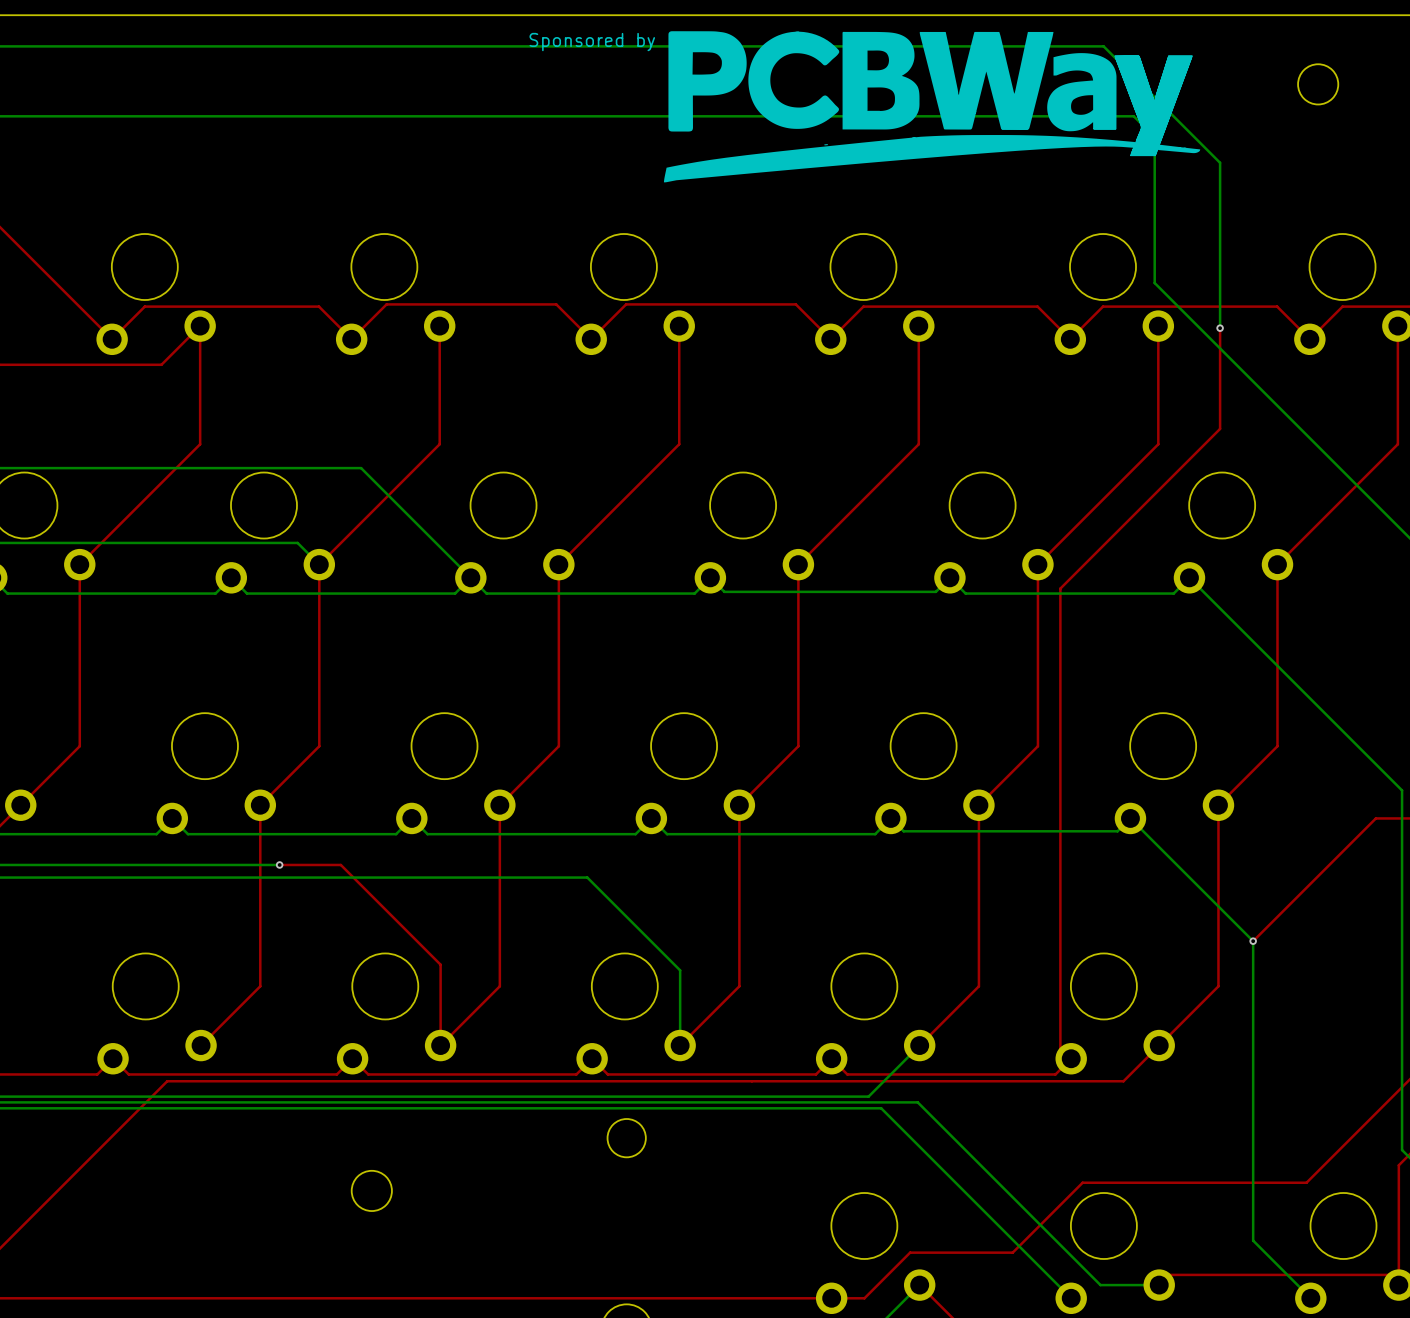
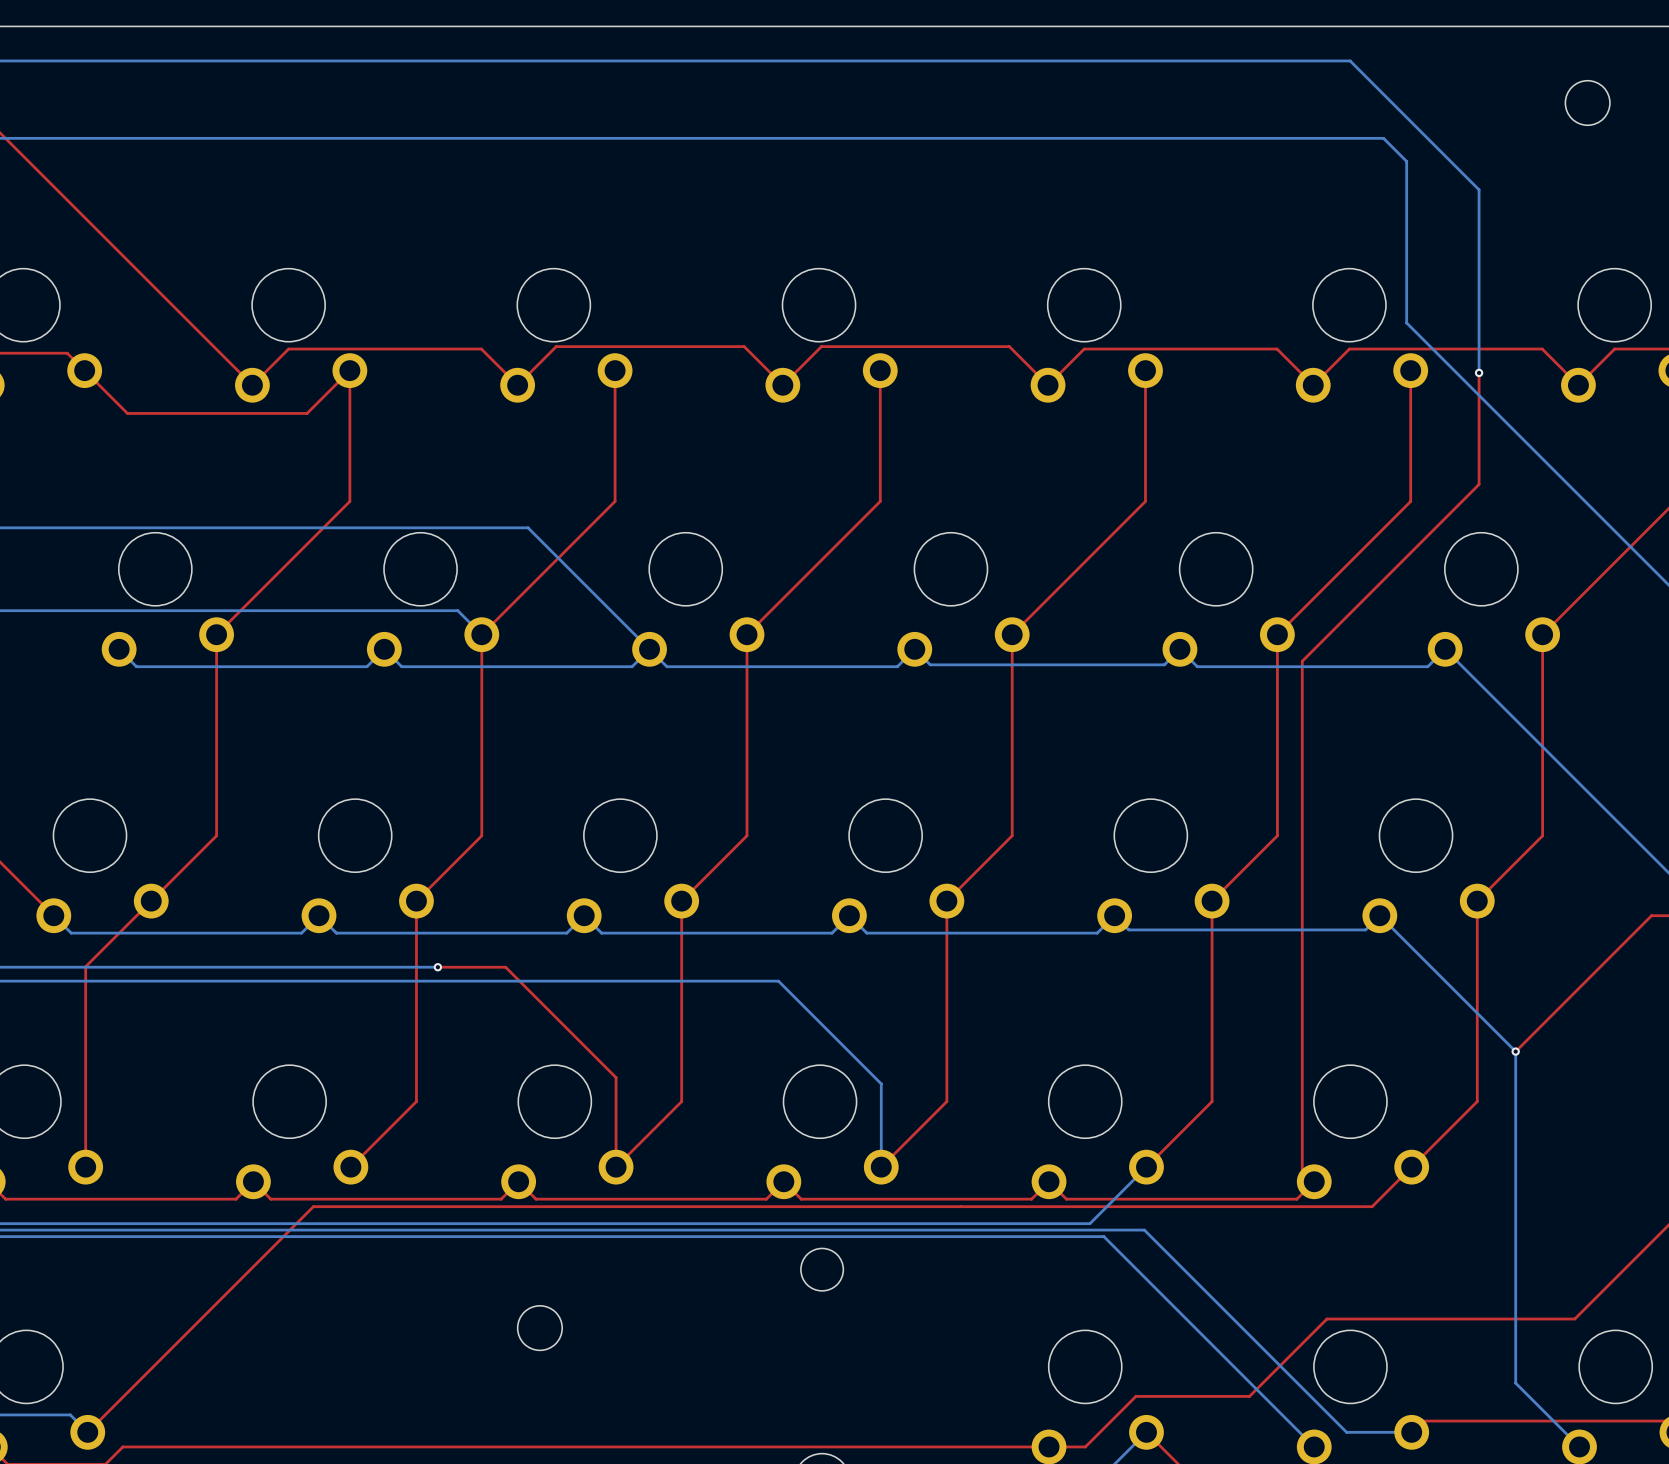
drawing: [663, 31, 1201, 183] -> none
text: Sponsored by (592, 42) -> none

